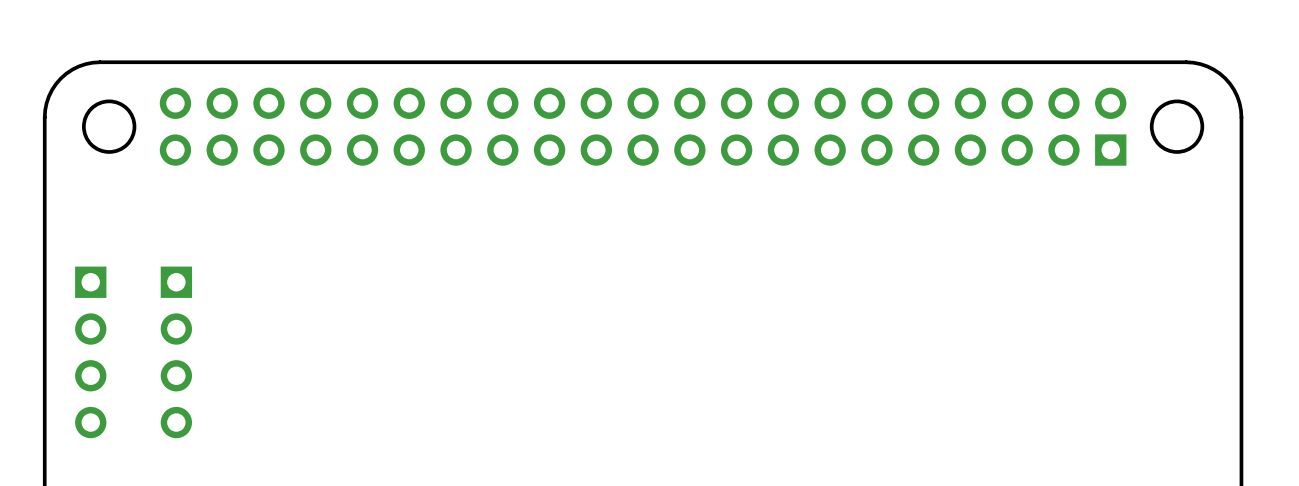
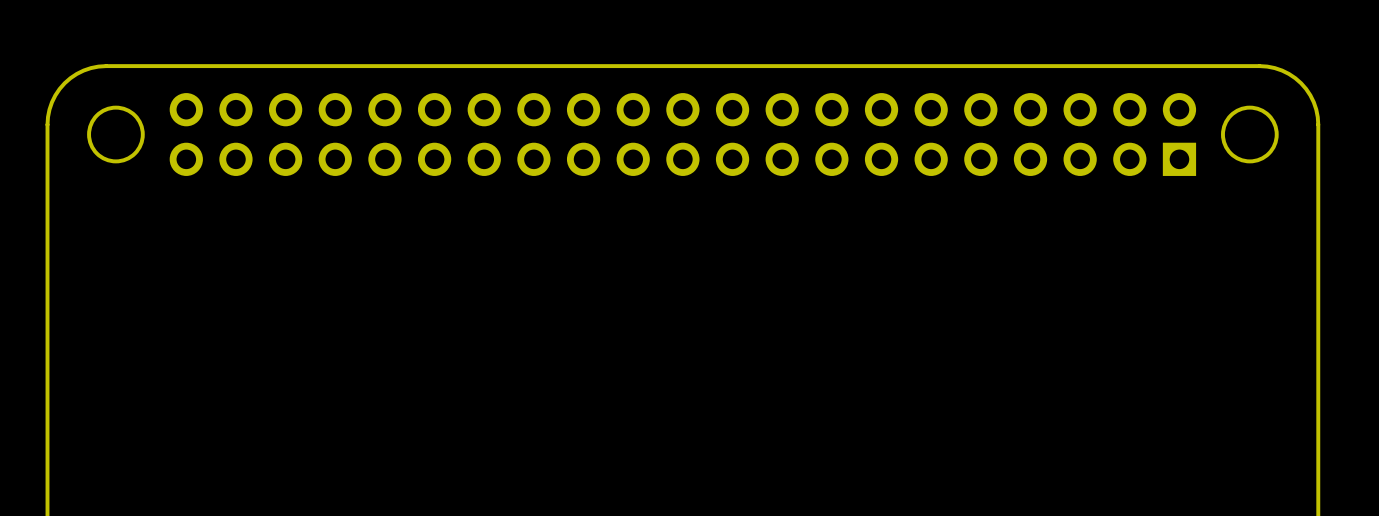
part: (90, 352) -> none
part: (176, 352) -> none

